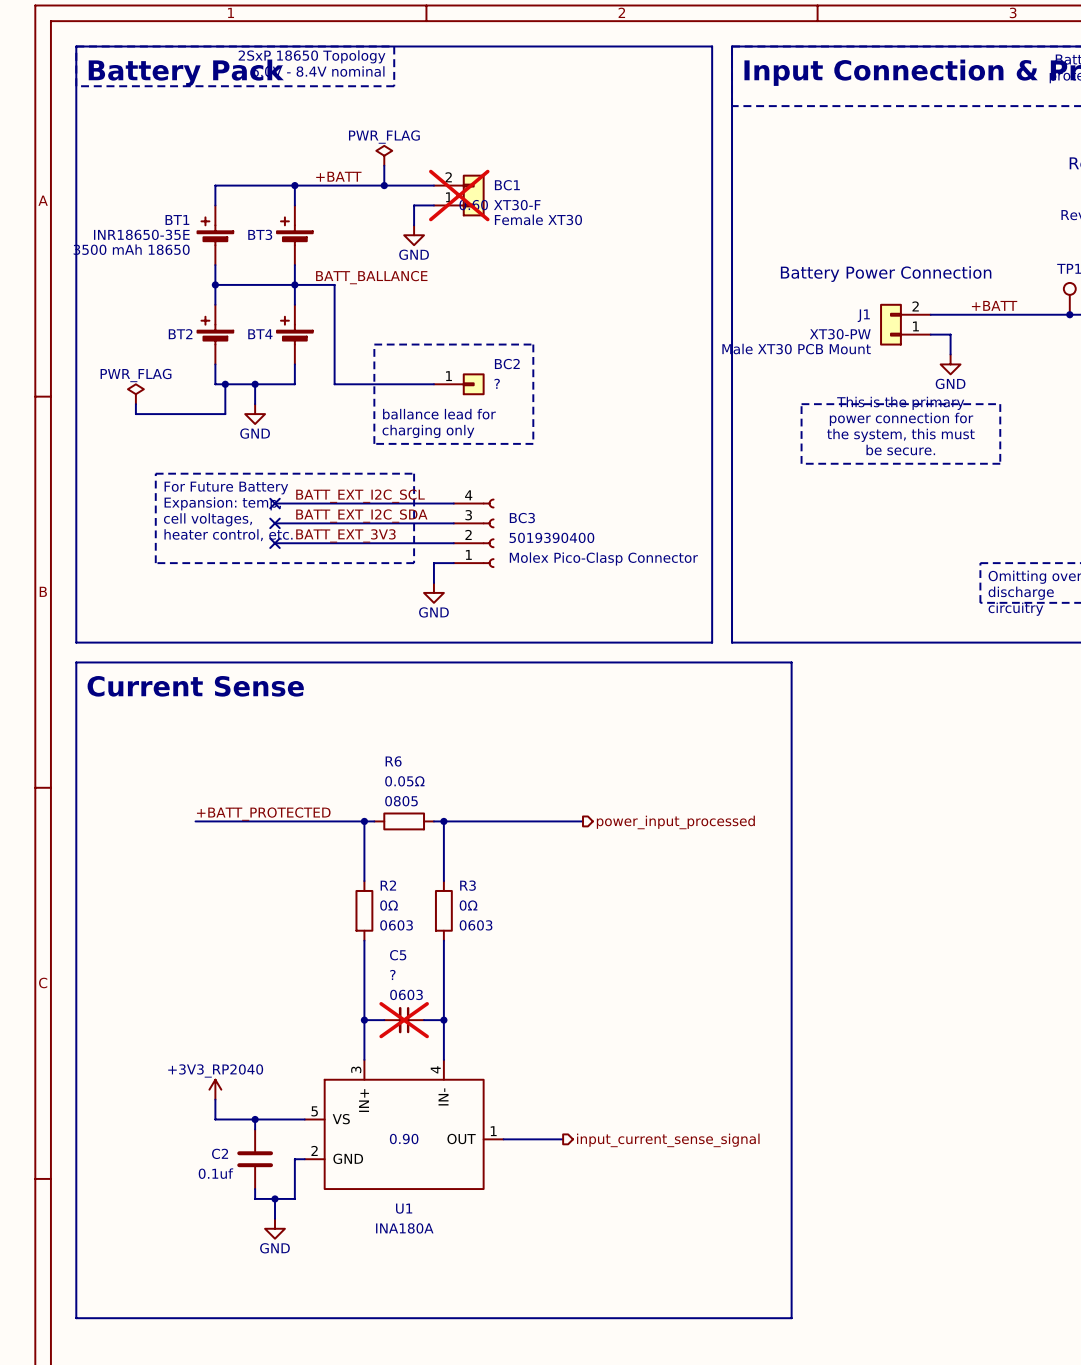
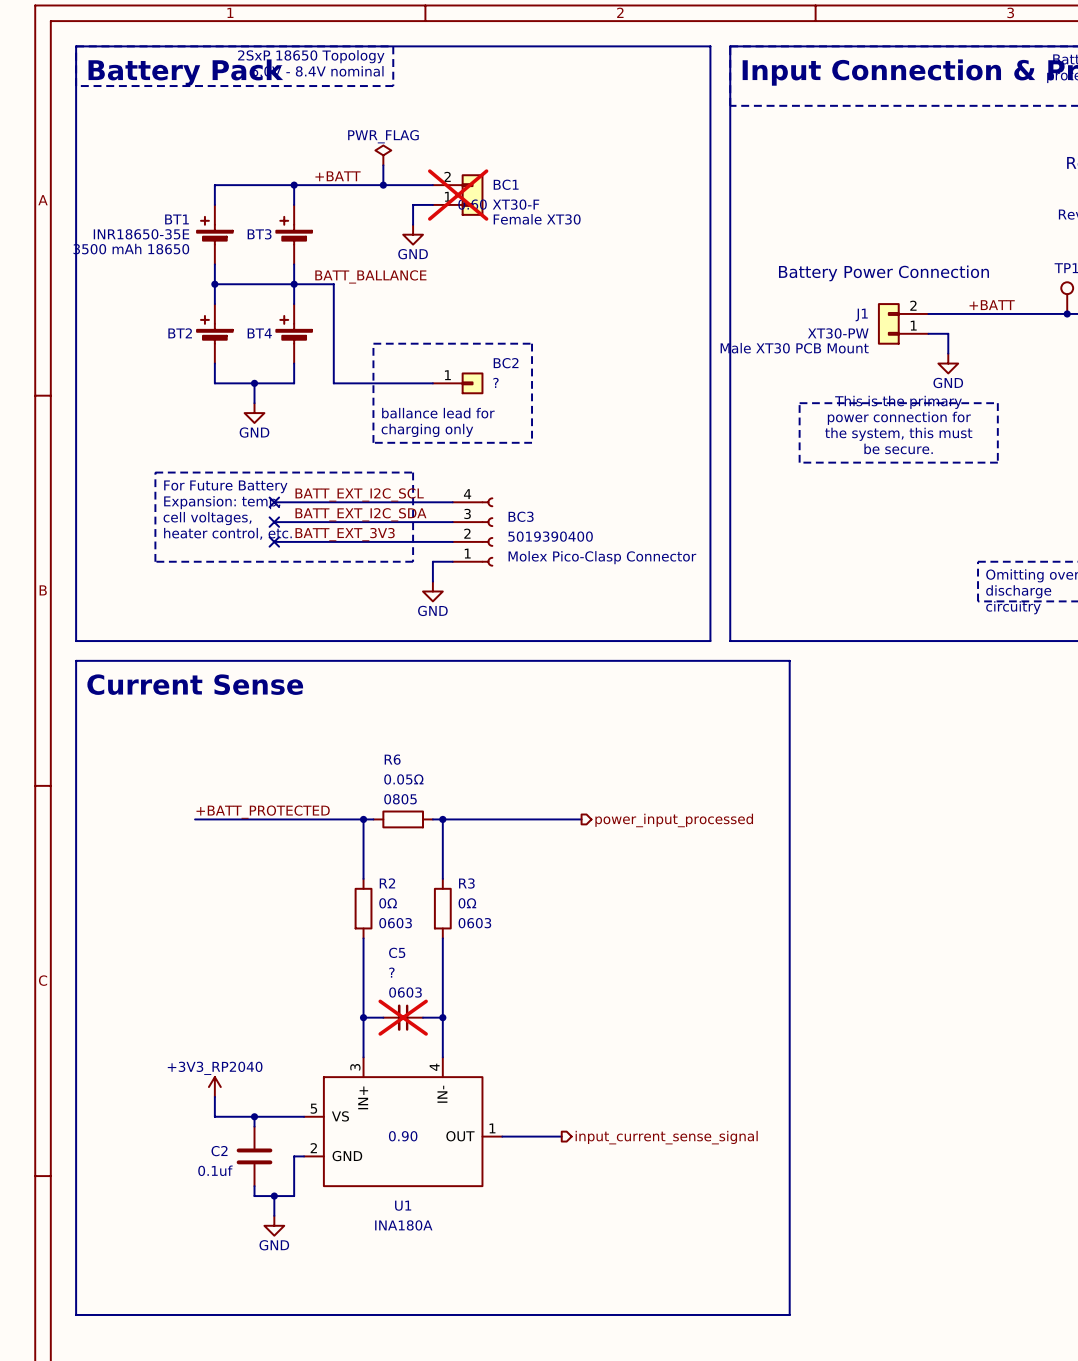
wire: (225, 384) (225, 414) (135, 414) (135, 404) -> none
junction: (225, 384) -> none
power symbol: PWR_FLAG (135, 394) -> none

